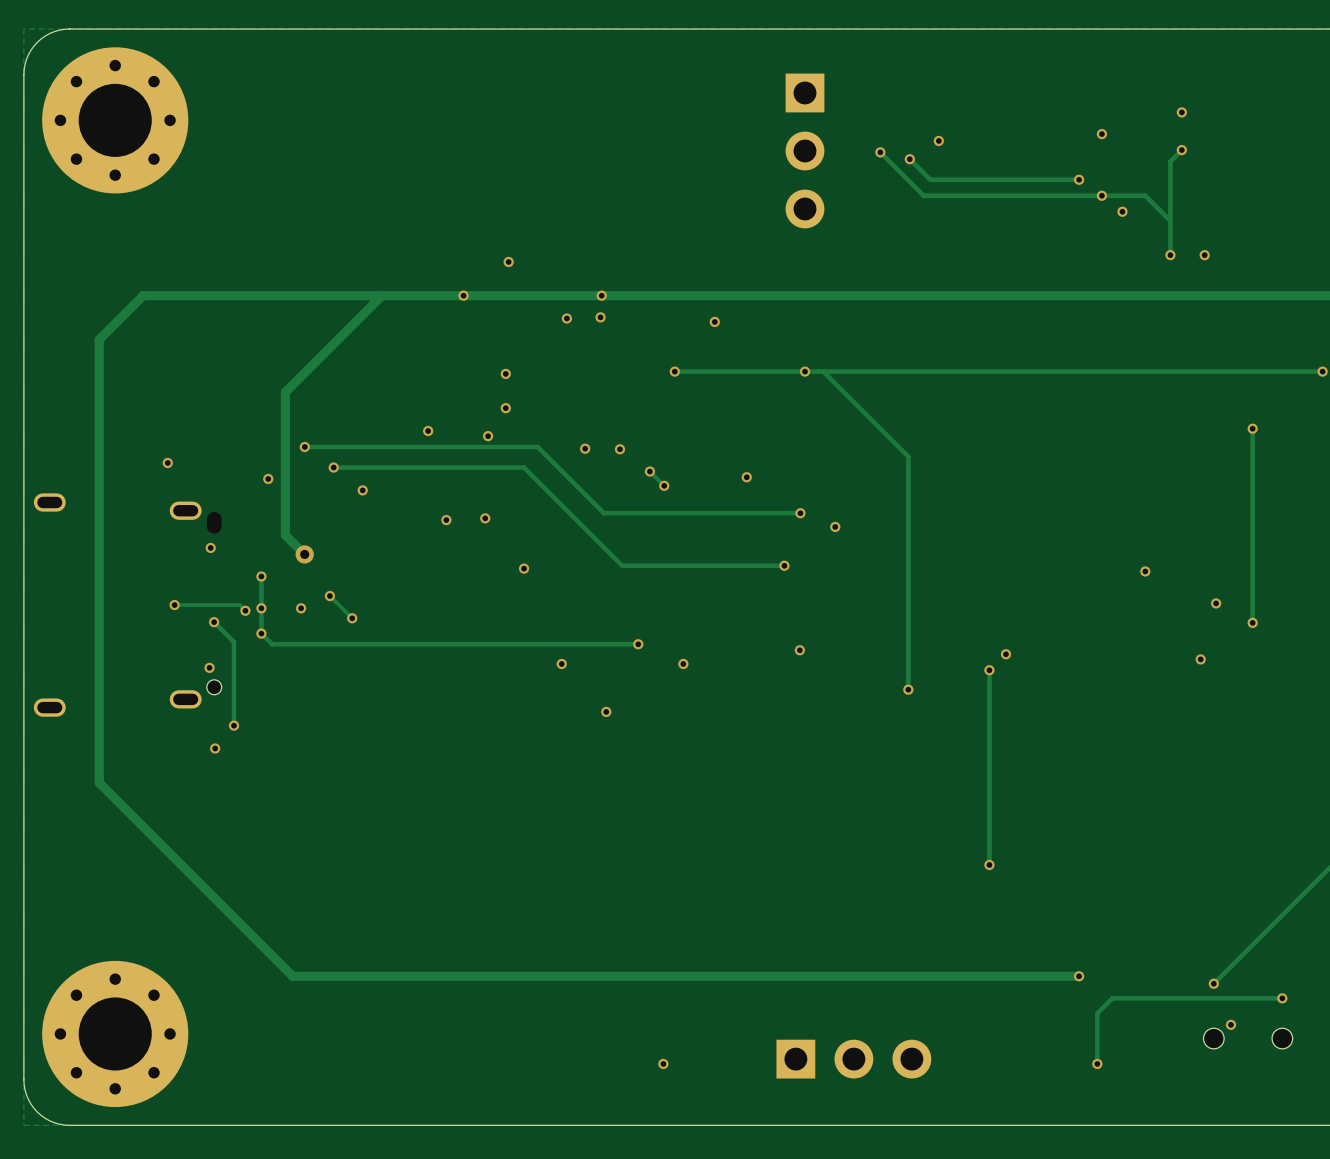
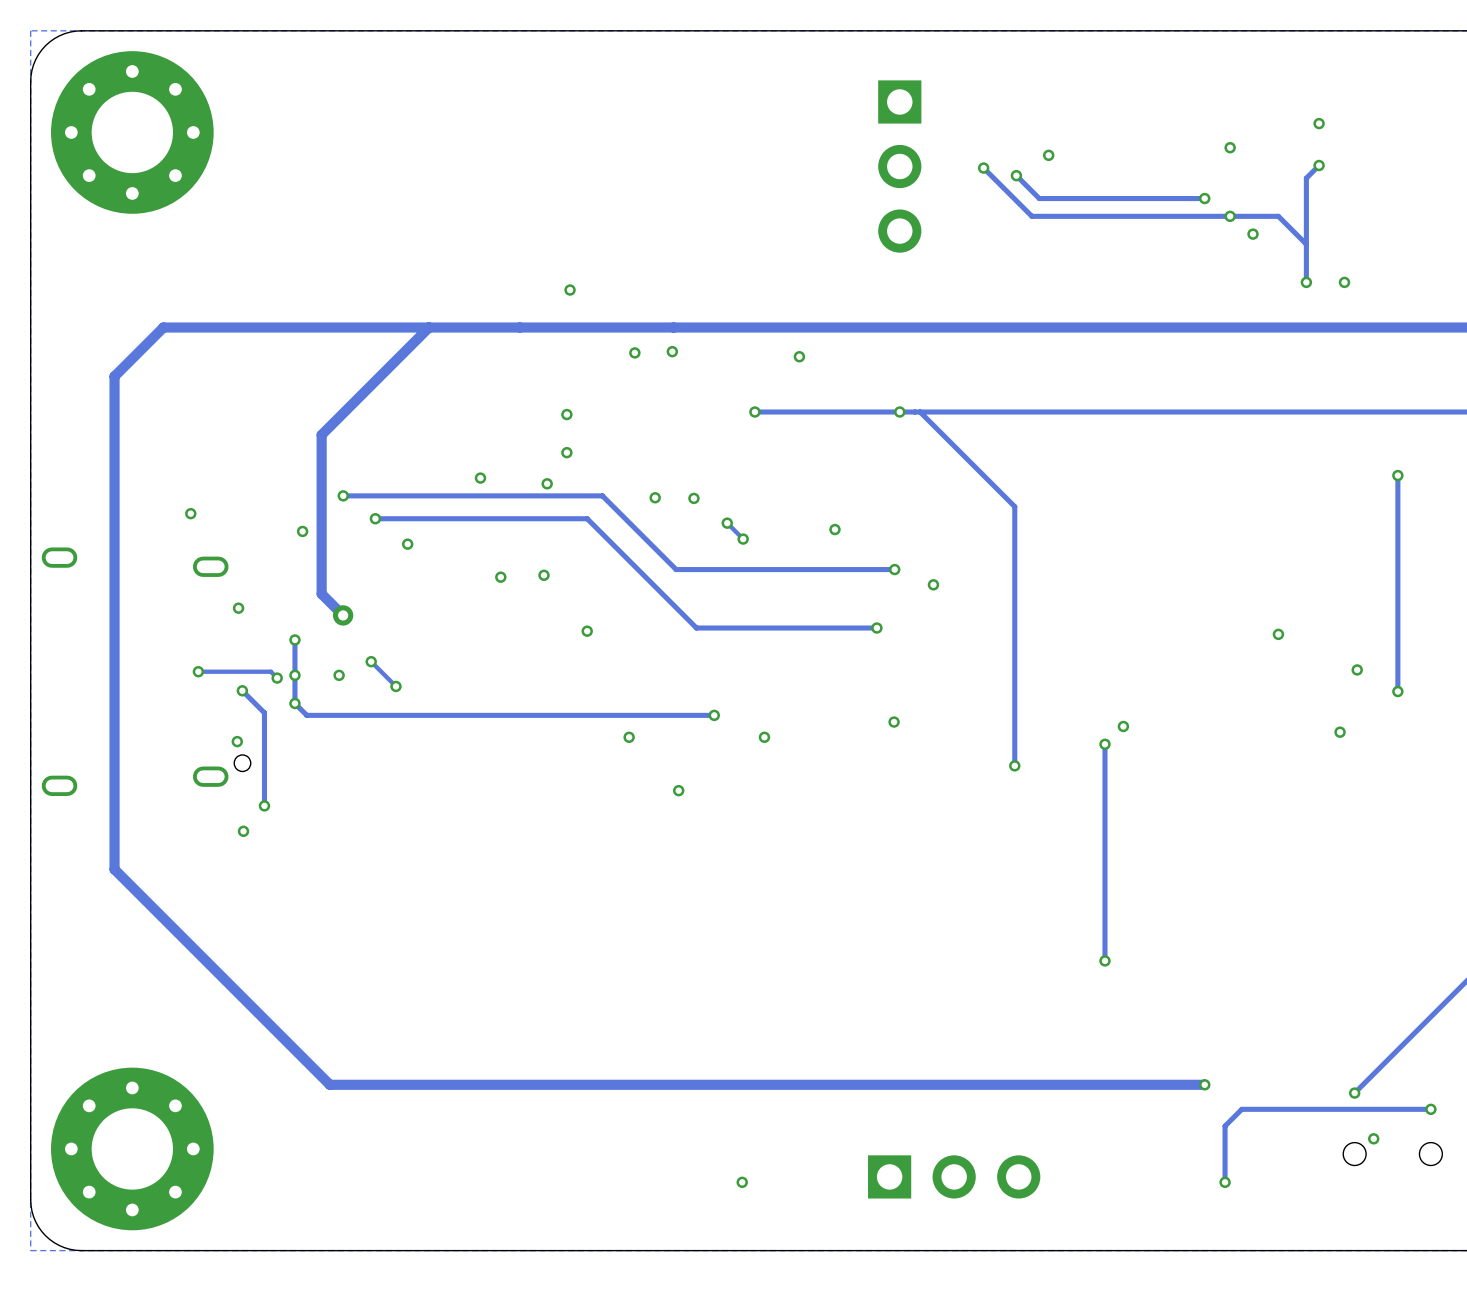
via: (463, 295) -> none
via: (601, 295) -> none

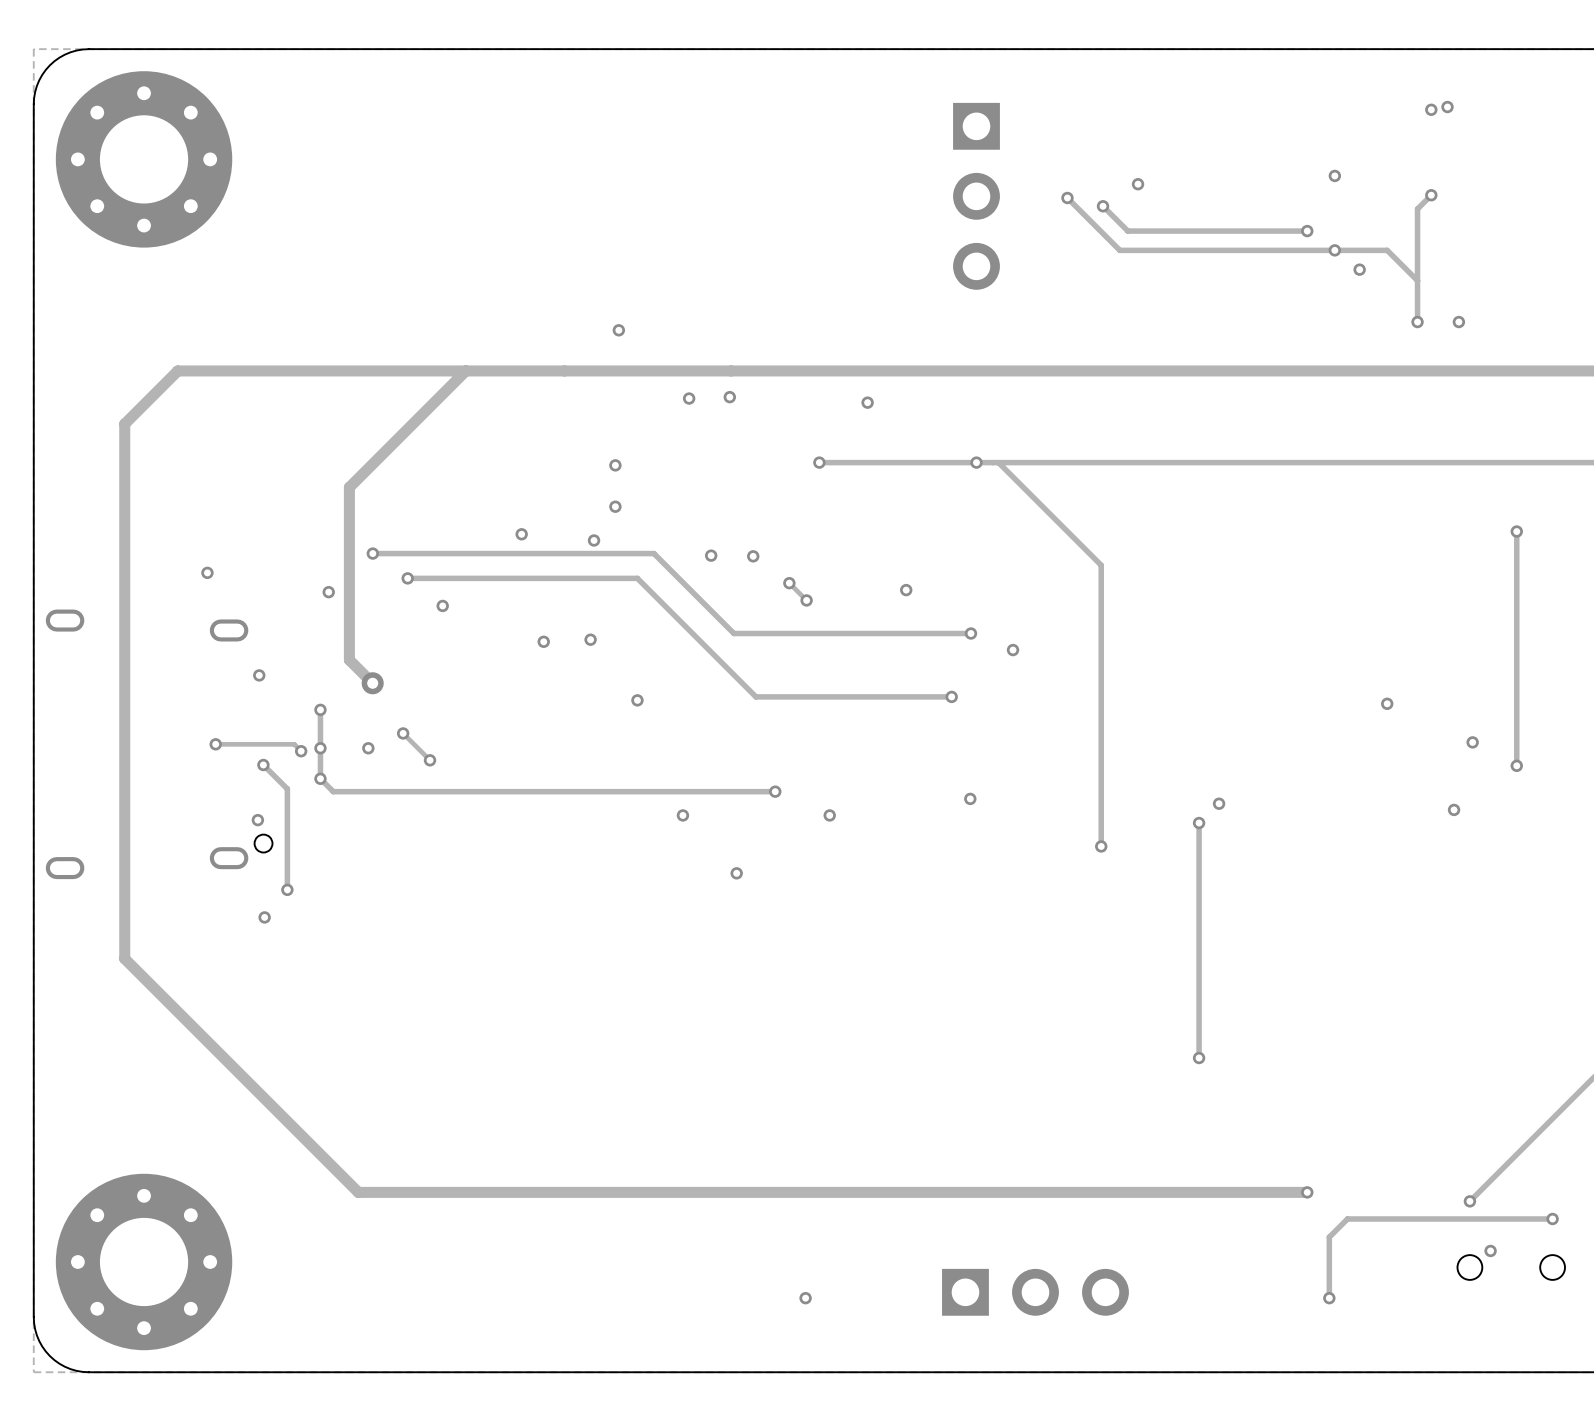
via: none -> (1447, 107)
via: none -> (1431, 109)
via: (1319, 123) -> none

